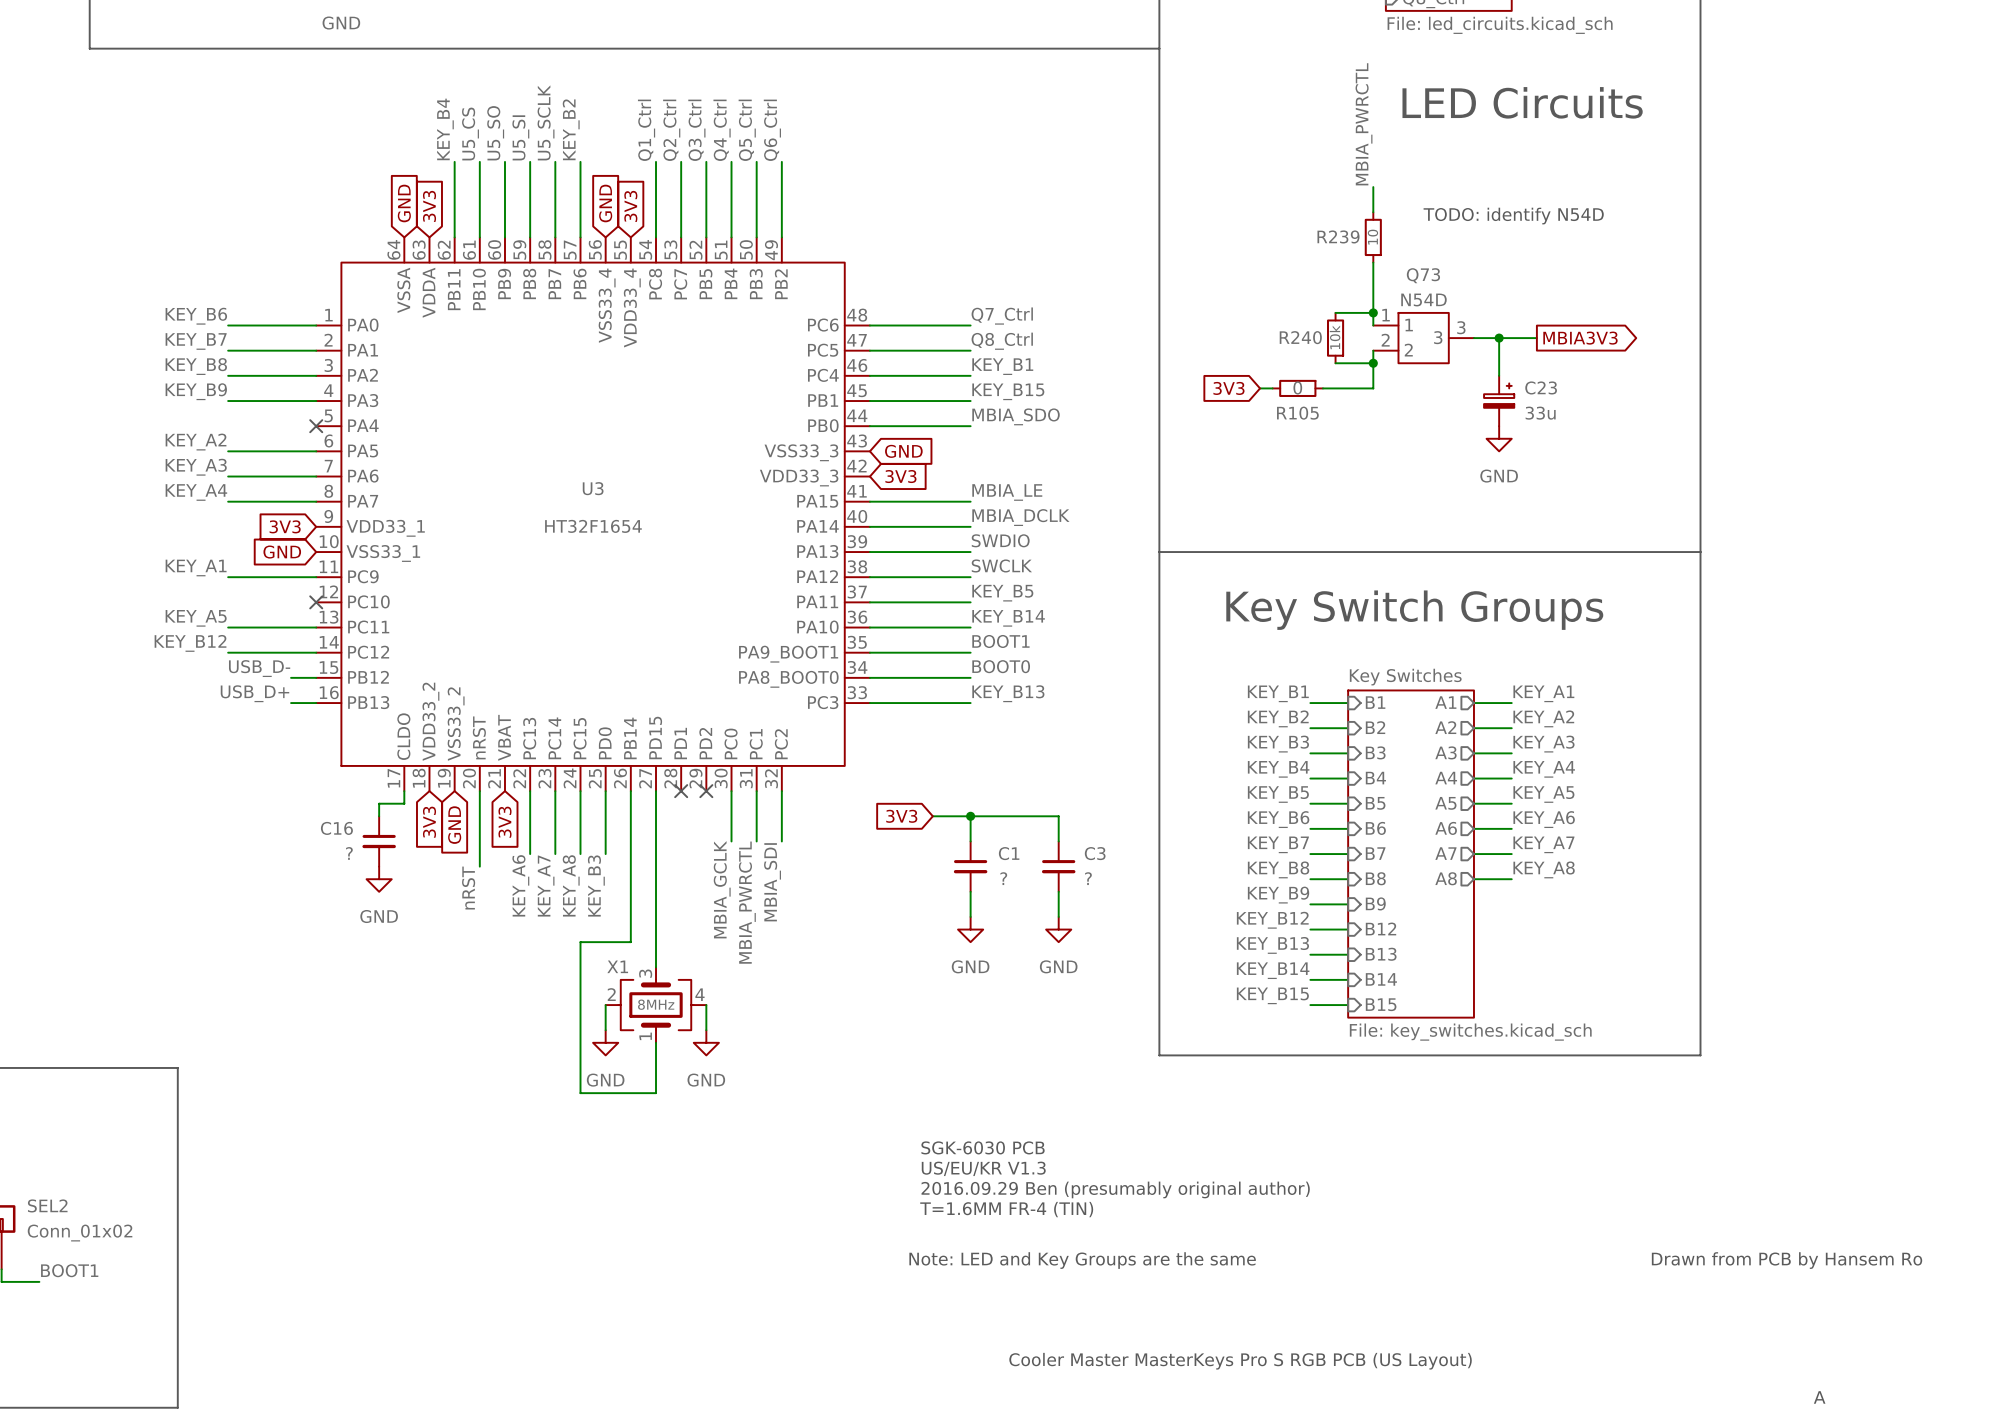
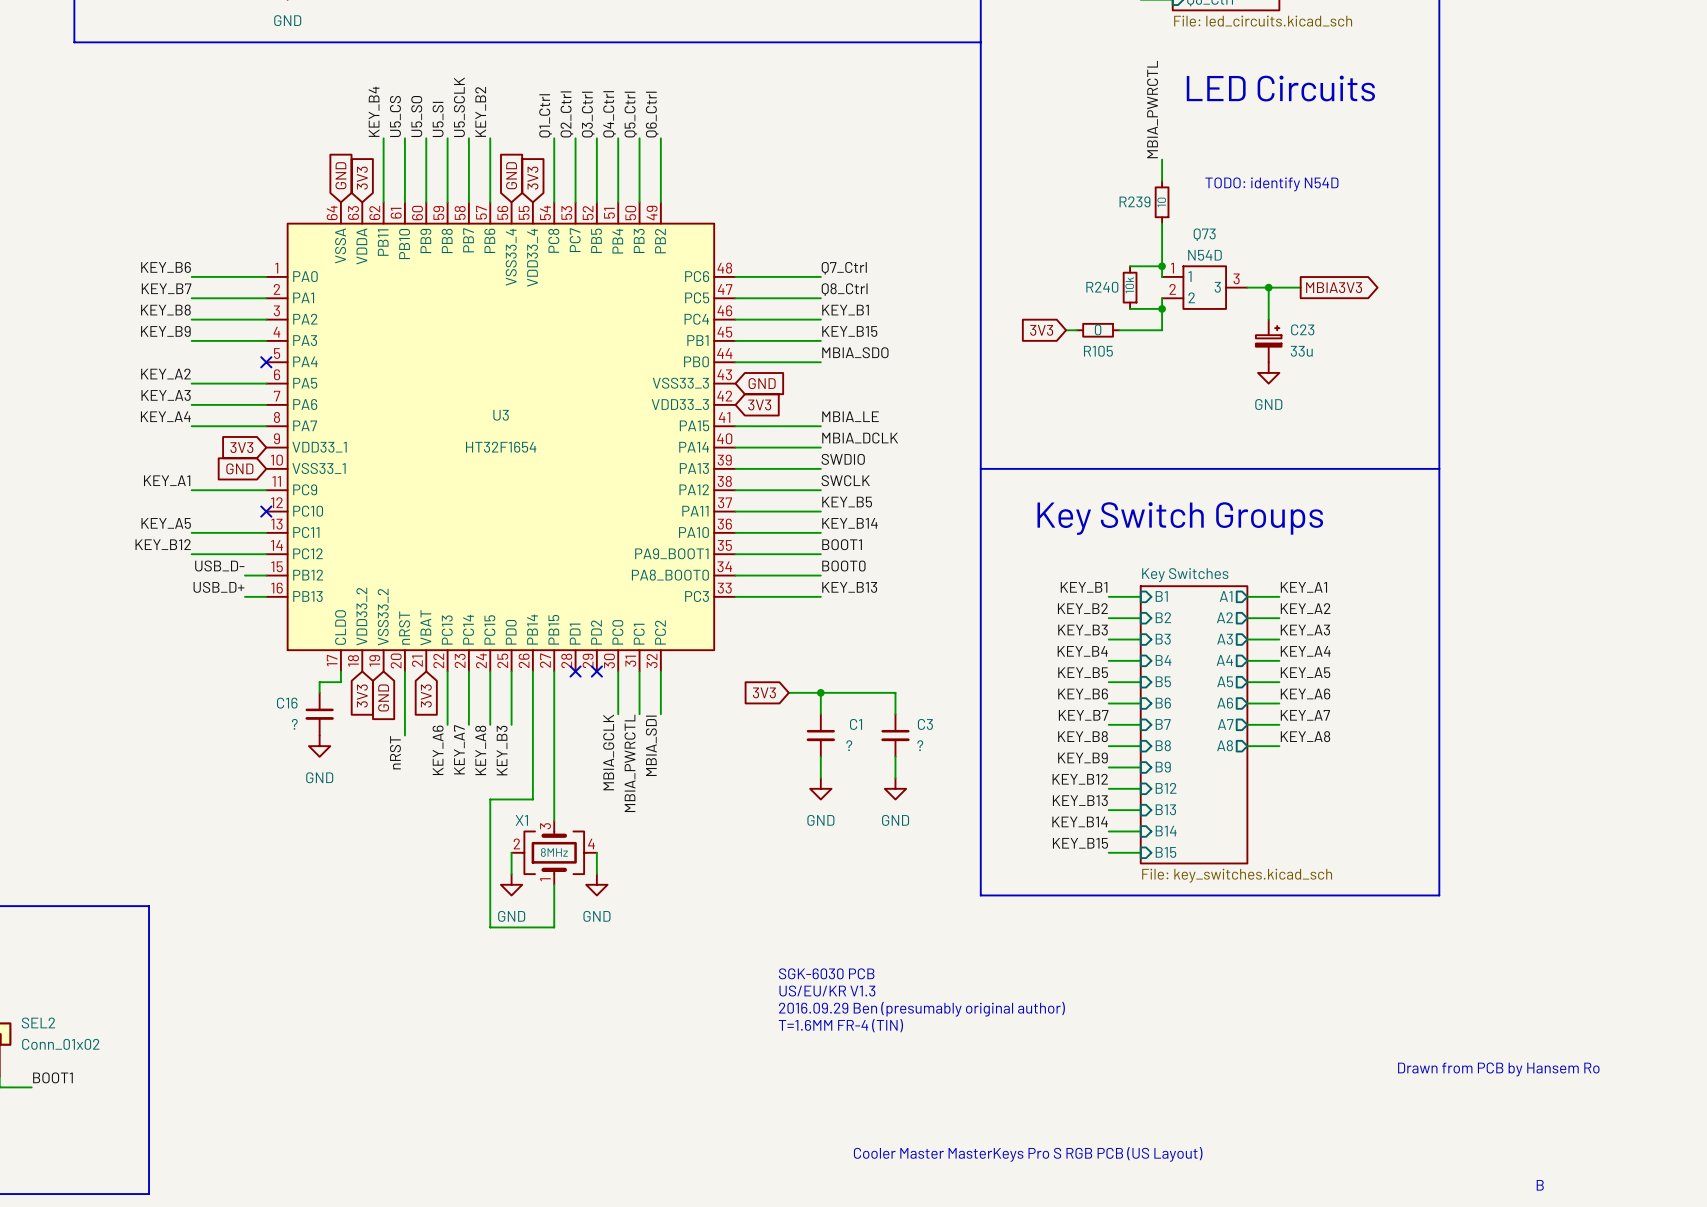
U3 pin name: PD15 (655, 738) -> PB15 (553, 629)
text: Note: LED and Key Groups are the same (1082, 1260) -> none
text: A (1819, 1397) -> B (1540, 1185)

